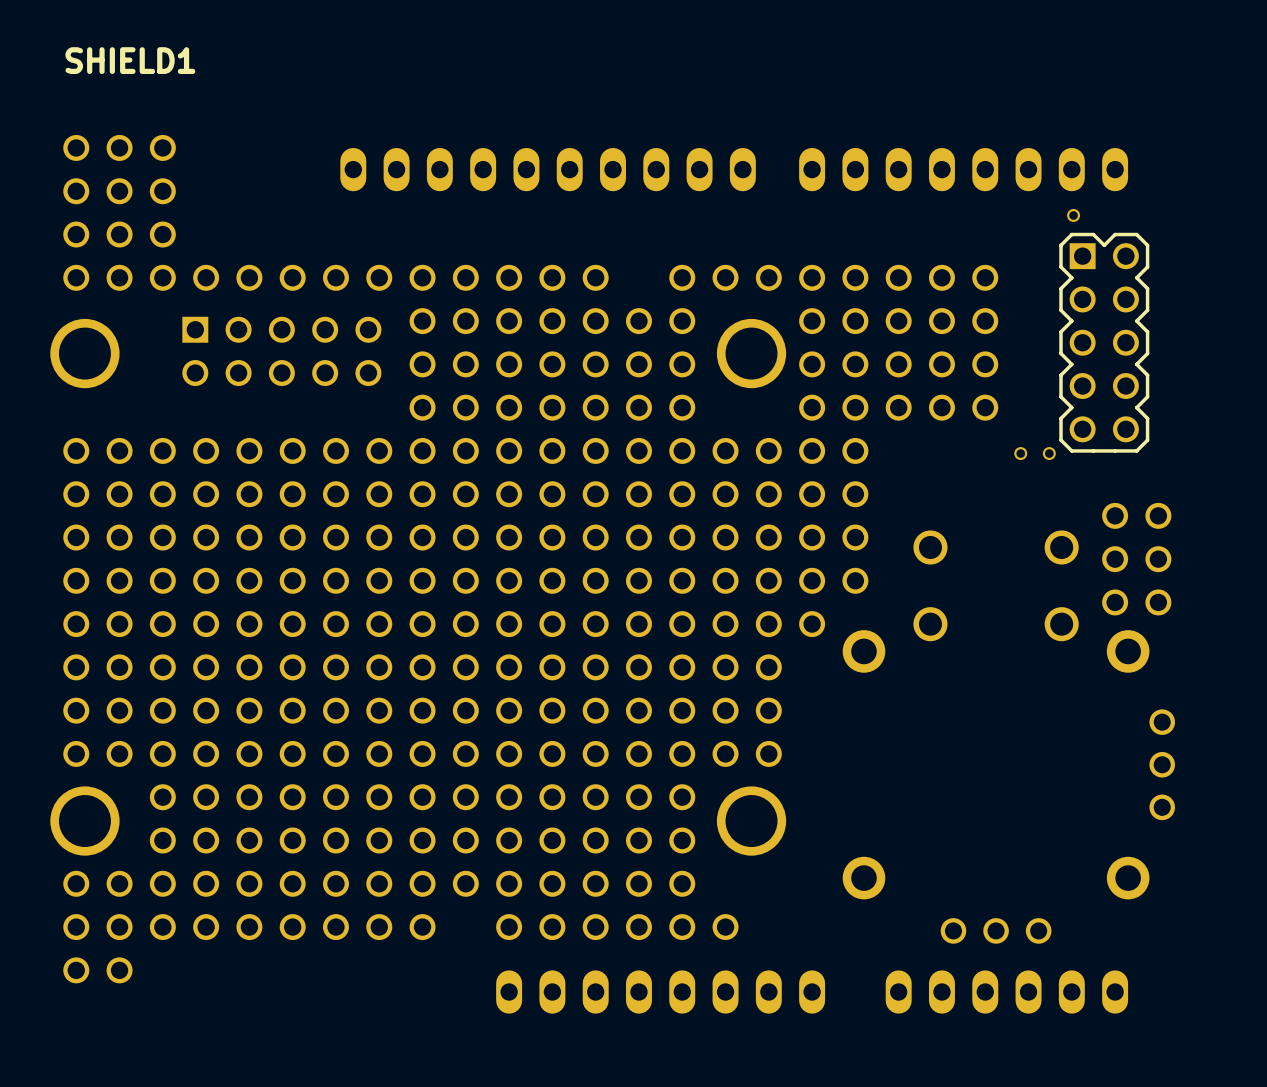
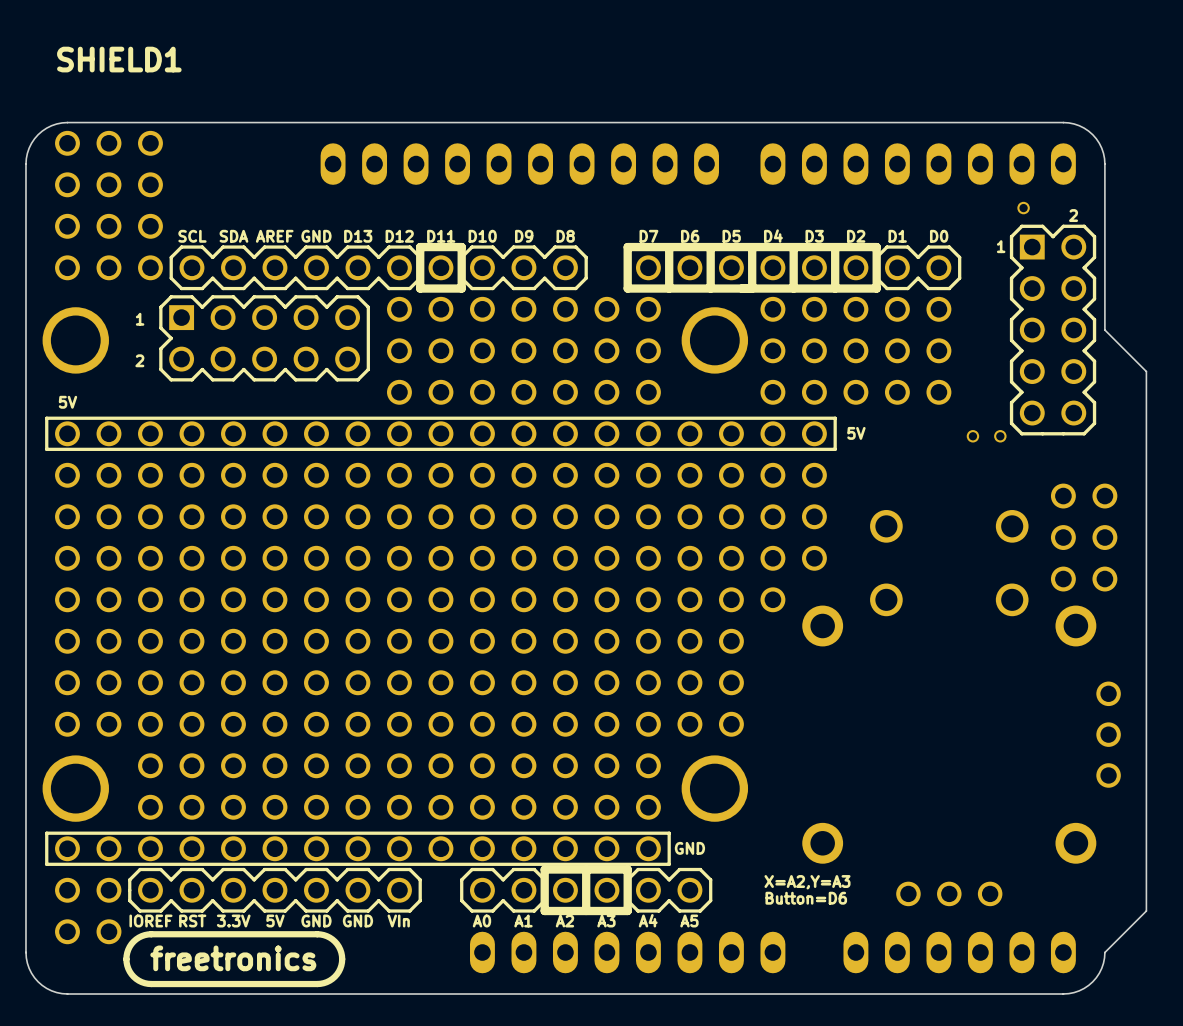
board edge: none -> (67, 122) (1063, 122) (1079, 125) (1088, 131) (1099, 143) (1104, 158) (1104, 330) (1146, 371) (1146, 911) (1104, 952) (1101, 968) (1096, 977) (1084, 988) (1063, 994) (67, 994) (51, 990) (42, 985) (31, 973) (25, 952) (25, 164) (29, 148) (38, 134) (51, 125) (67, 122)
text: none -> 2 (1073, 215)
text: none -> SCL (192, 236)
text: none -> SDA (233, 236)
text: none -> AREF (274, 236)
text: none -> GND (316, 236)
text: none -> D13 (358, 236)
text: none -> D12 (399, 236)
text: none -> D11 (441, 236)
text: none -> D10 (482, 236)
text: none -> D9 (524, 236)
text: none -> D8 (565, 236)
text: none -> D7 (648, 236)
text: none -> D6 (690, 236)
text: none -> D5 (731, 236)
text: none -> D4 (773, 236)
text: none -> D3 (814, 236)
text: none -> D2 (856, 236)
text: none -> D1 (897, 236)
text: none -> D0 (939, 236)
text: none -> 1 (1001, 246)
line: none -> (420, 247) (420, 288) (461, 288) (461, 247) (420, 247)
line: none -> (627, 247) (876, 247) (876, 288) (627, 288) (627, 247)
line: none -> (669, 247) (669, 288)
line: none -> (710, 247) (710, 288)
line: none -> (752, 247) (752, 288)
line: none -> (793, 247) (793, 288)
line: none -> (835, 247) (835, 288)
line: none -> (420, 257) (409, 247) (389, 247) (378, 257) (368, 247) (347, 247) (337, 257) (326, 247) (306, 247) (295, 257) (285, 247) (264, 247) (254, 257) (243, 247) (223, 247) (212, 257) (202, 247) (181, 247) (171, 257) (171, 278) (181, 288) (202, 288) (212, 278) (223, 288) (243, 288) (254, 278) (264, 288) (285, 288) (295, 278) (306, 288) (326, 288) (337, 278) (347, 288) (368, 288) (378, 278) (389, 288) (409, 288) (420, 278)
line: none -> (461, 257) (472, 247) (492, 247) (503, 257) (513, 247) (534, 247) (544, 257) (555, 247) (575, 247) (586, 257) (586, 278) (575, 288) (555, 288) (544, 278) (534, 288) (513, 288) (503, 278) (492, 288) (472, 288) (461, 278)
line: none -> (876, 257) (887, 247) (907, 247) (918, 257) (928, 247) (949, 247) (959, 257) (959, 278) (949, 288) (928, 288) (918, 278) (907, 288) (887, 288) (876, 278)
line: none -> (171, 296) (191, 296) (202, 307) (212, 296) (233, 296) (243, 307) (254, 296) (274, 296) (285, 307) (295, 296) (316, 296) (326, 307) (337, 296) (357, 296) (368, 307) (368, 369) (357, 379) (337, 379) (326, 369) (316, 379) (295, 379) (285, 369) (274, 379) (254, 379) (243, 369) (233, 379) (212, 379) (202, 369) (191, 379) (171, 379) (160, 369) (160, 348) (171, 338) (160, 327) (160, 307) (171, 296)
text: none -> 1 (140, 319)
text: none -> 2 (139, 360)
text: none -> 5V (67, 402)
line: none -> (46, 418) (46, 449) (835, 449) (835, 418) (46, 418)
text: none -> 5V (856, 433)
line: none -> (46, 833) (46, 864) (669, 864) (669, 833) (46, 833)
text: none -> GND (689, 848)
line: none -> (140, 869) (160, 869) (171, 879) (181, 869) (202, 869) (212, 879) (223, 869) (243, 869) (254, 879) (264, 869) (285, 869) (295, 879) (306, 869) (326, 869) (337, 879) (347, 869) (368, 869) (378, 879) (389, 869) (409, 869) (420, 879) (420, 900) (409, 911) (389, 911) (378, 900) (368, 911) (347, 911) (337, 900) (326, 911) (306, 911) (295, 900) (285, 911) (264, 911) (254, 900) (243, 911) (223, 911) (212, 900) (202, 911) (181, 911) (171, 900) (160, 911) (140, 911) (129, 900) (129, 879) (140, 869)
line: none -> (544, 869) (627, 869) (627, 911) (544, 911) (544, 869)
line: none -> (586, 869) (586, 911)
line: none -> (544, 879) (534, 869) (513, 869) (503, 879) (492, 869) (472, 869) (461, 879) (461, 900) (472, 911) (492, 911) (503, 900) (513, 911) (534, 911) (544, 900)
line: none -> (627, 879) (638, 869) (658, 869) (669, 879) (679, 869) (700, 869) (710, 879) (710, 900) (700, 911) (679, 911) (669, 900) (658, 911) (638, 911) (627, 900)
text: none -> X=A2,Y=A3 (807, 882)
text: none -> Button=D6 (806, 898)
text: none -> A4 (648, 920)
text: none -> IOREF (150, 920)
text: none -> RST (192, 920)
text: none -> 3.3V (233, 920)
text: none -> 5V (275, 920)
text: none -> GND (316, 920)
text: none -> GND (357, 920)
text: none -> VIn (398, 920)
text: none -> A0 (481, 920)
text: none -> A1 (523, 920)
text: none -> A2 (564, 920)
text: none -> A3 (606, 920)
text: none -> A5 (689, 920)
drawing: none -> [123, 931, 346, 988]

